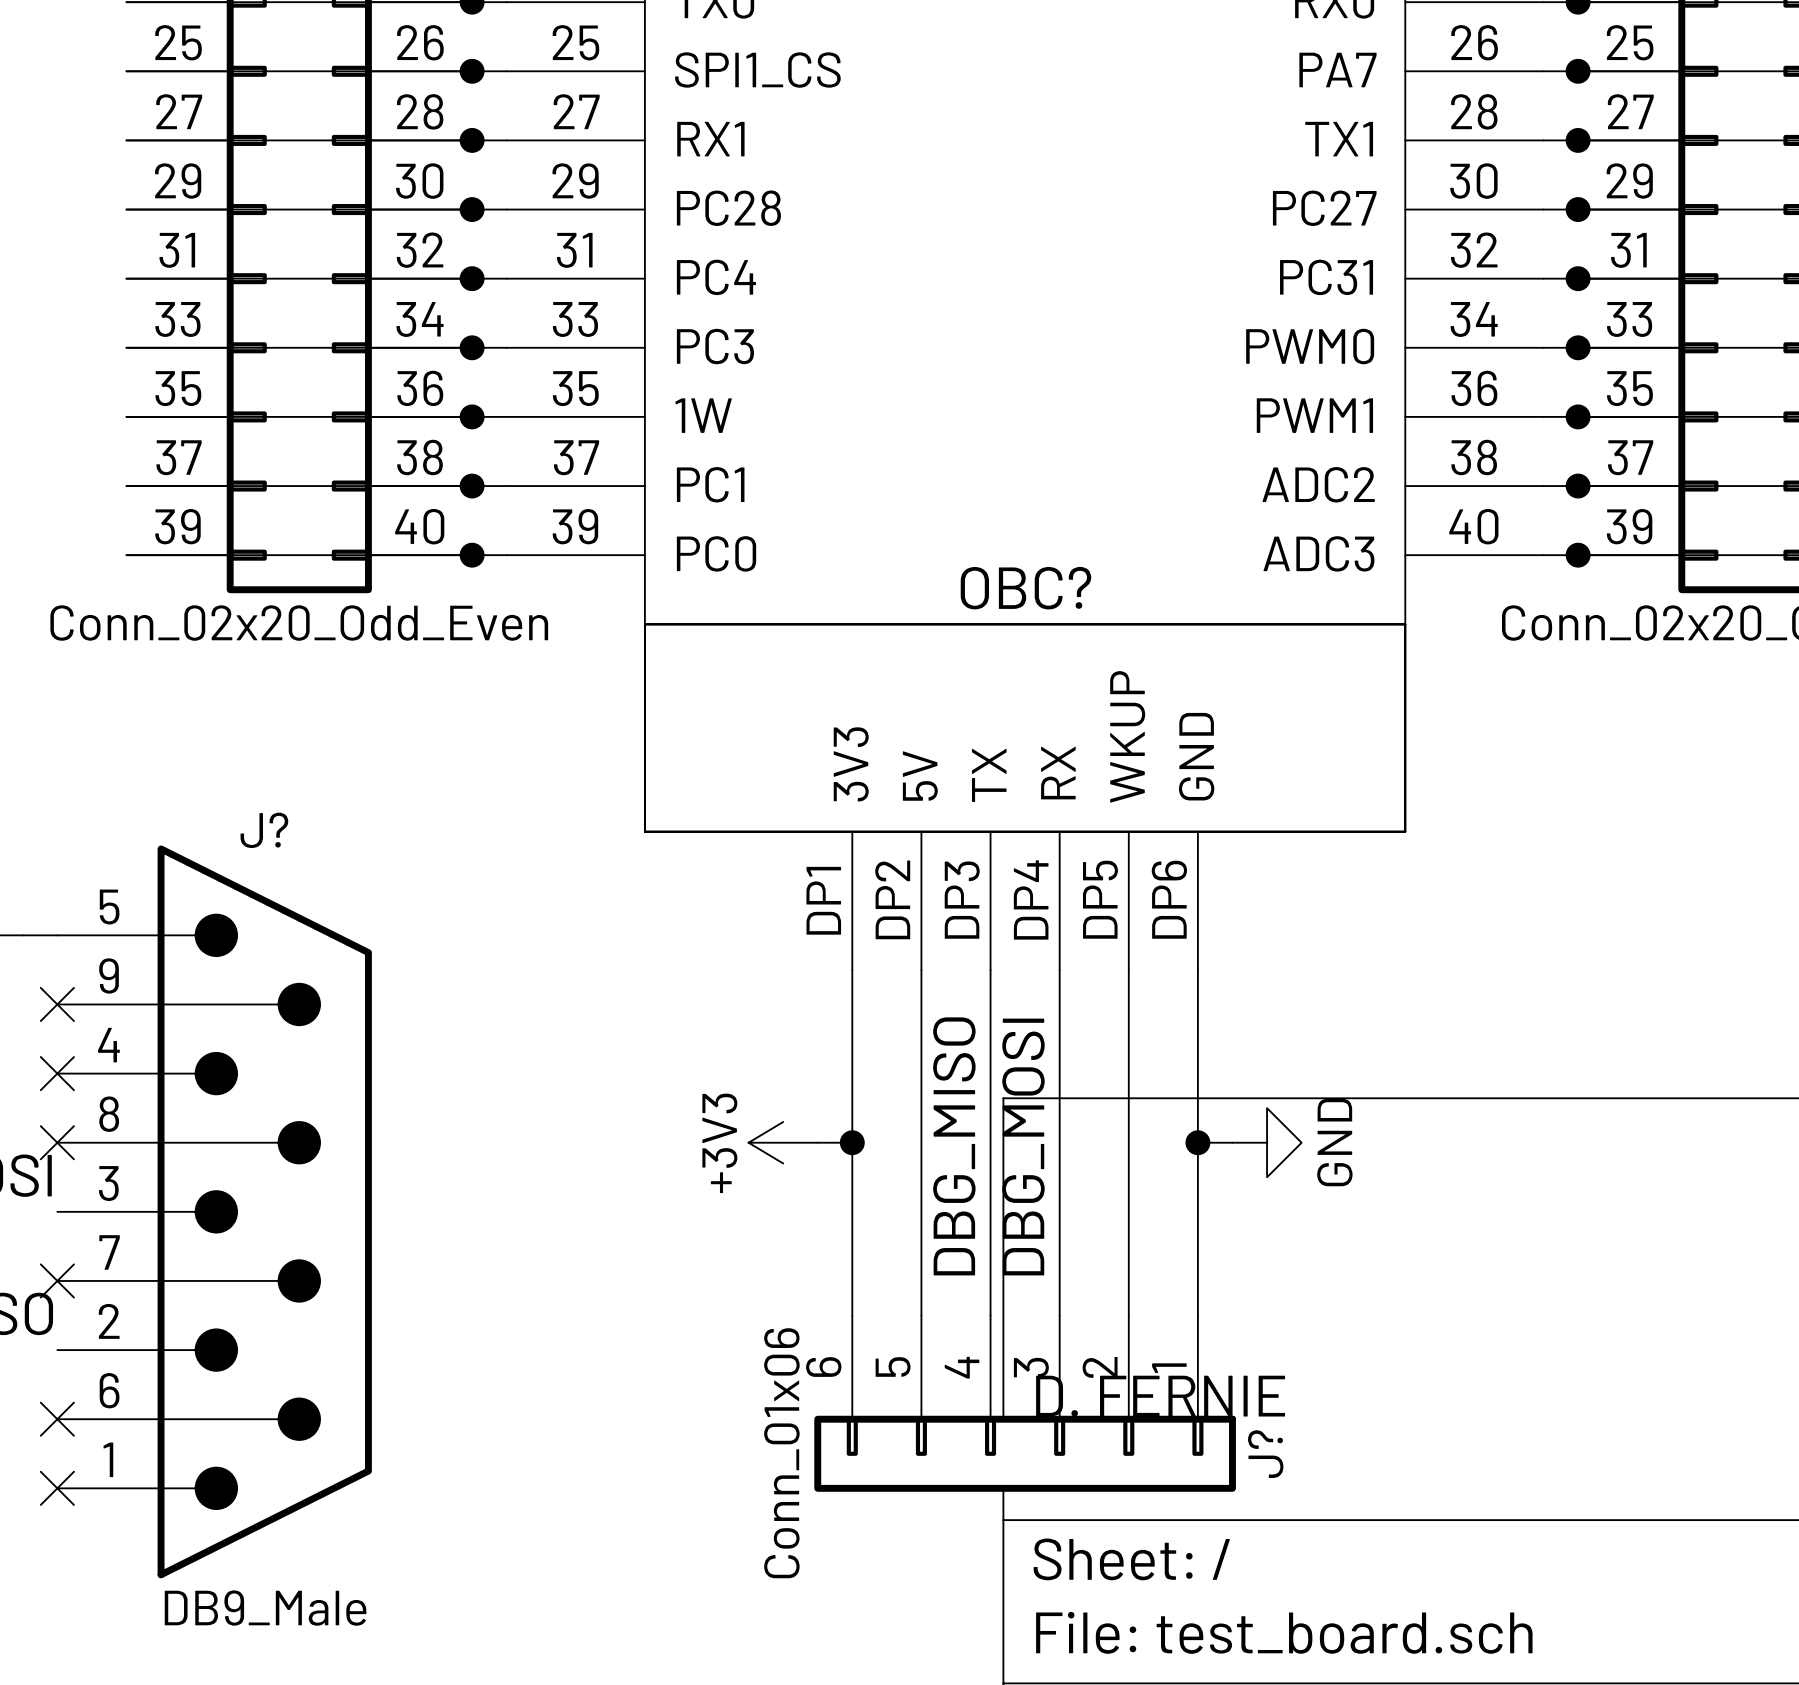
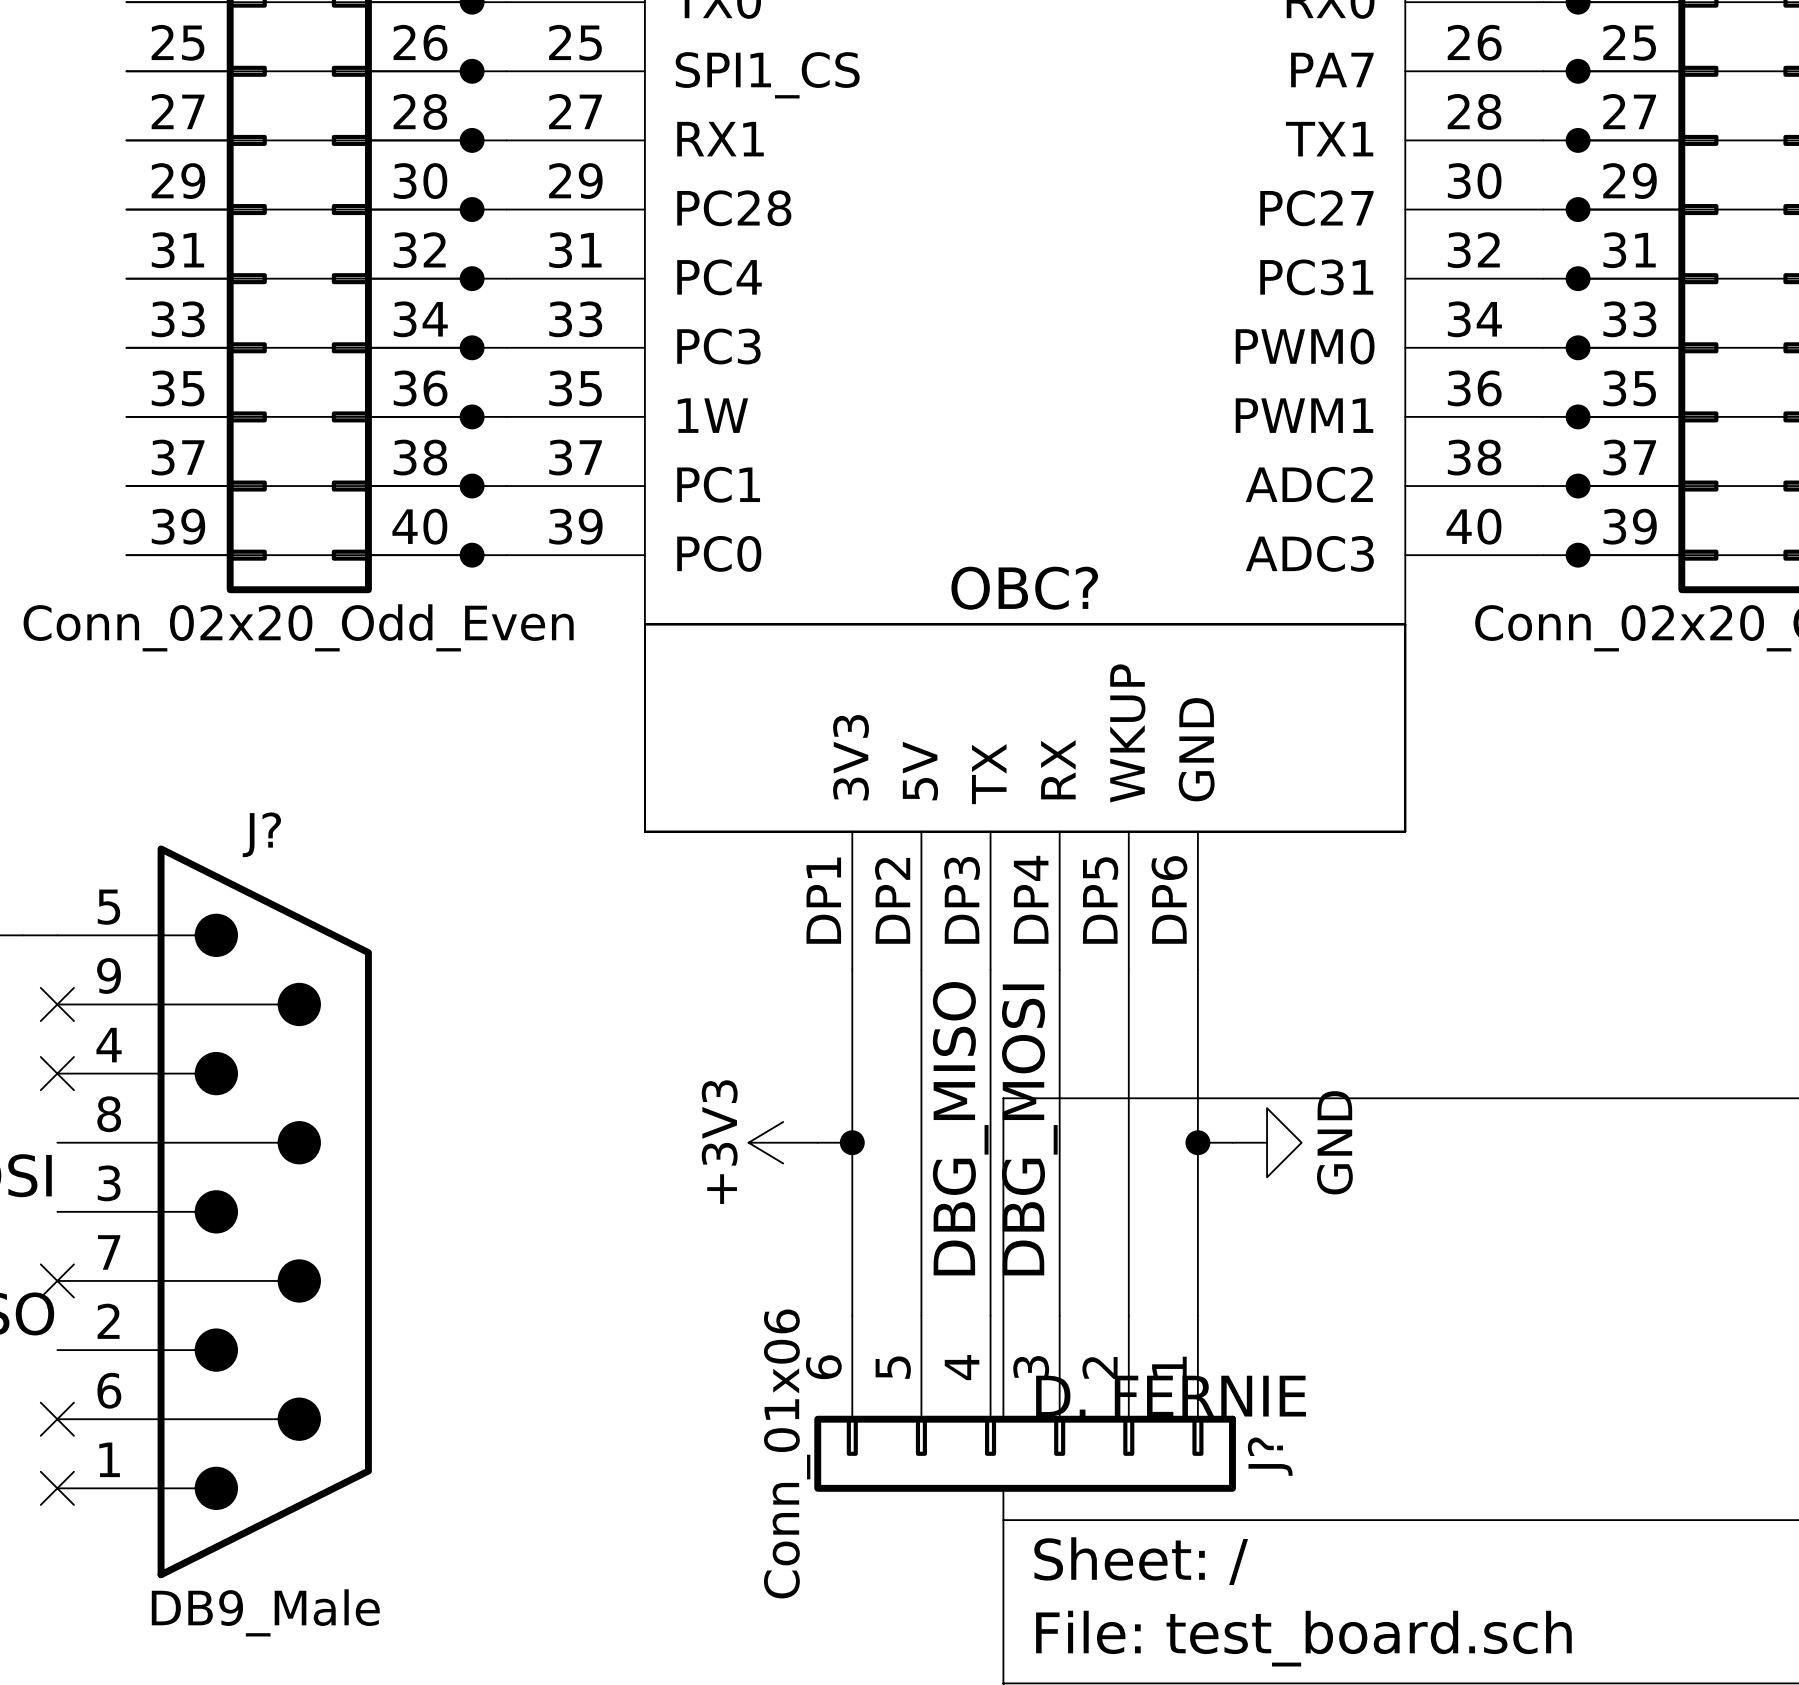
no-connect mark: (57, 1142) -> none

